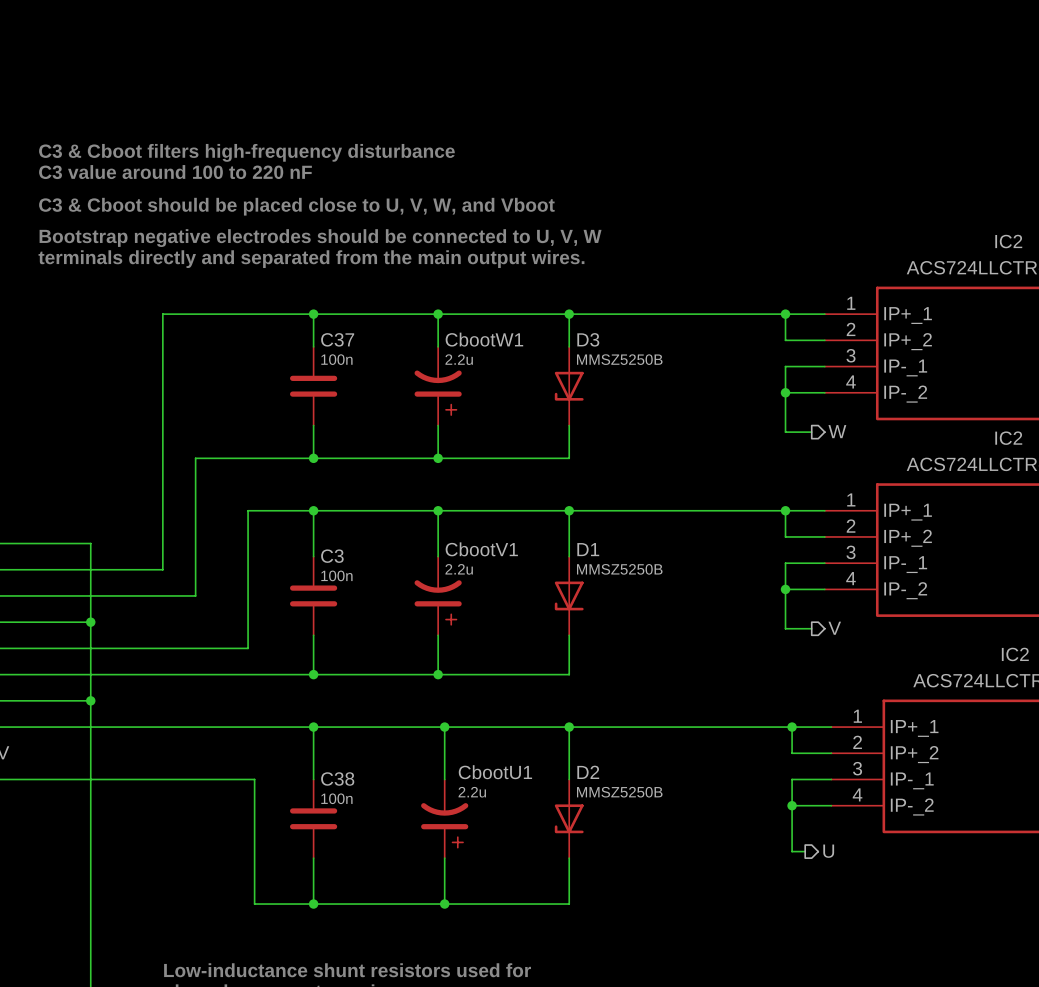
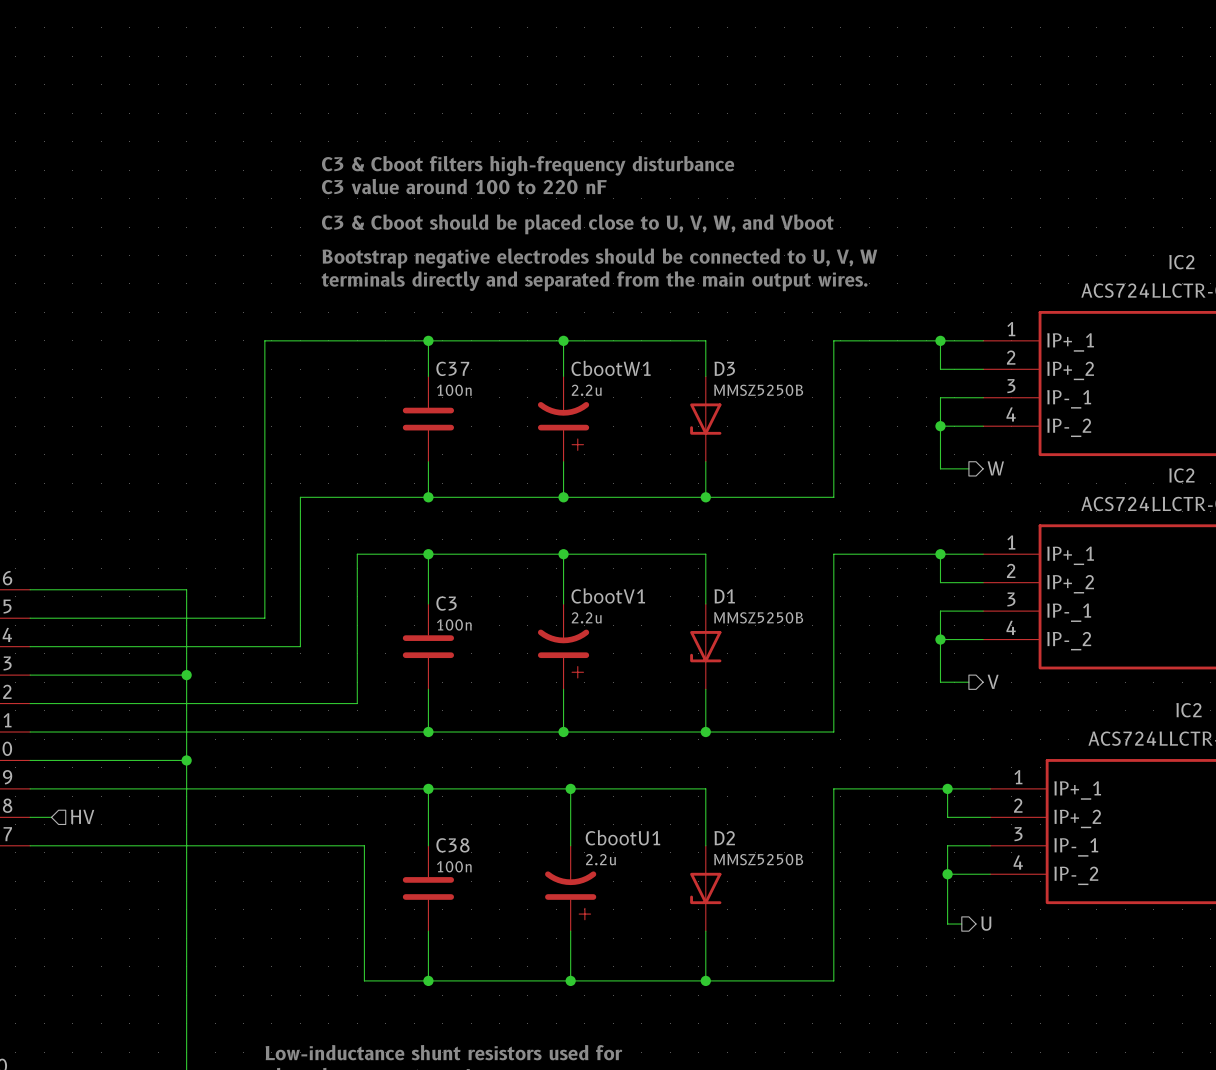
text position: C3 & Cboot filters high-frequency disturbance (246, 152) -> C3 & Cboot filters high-frequency disturbance (528, 165)
text position: C3 value around 100 to 220 nF (175, 172) -> C3 value around 100 to 220 nF (464, 186)
text position: C3 & Cboot should be placed close to U, V, W, and Vboot (296, 206) -> C3 & Cboot should be placed close to U, V, W, and Vboot (577, 224)
text position: Bootstrap negative electrodes should be connected to U, V, W (320, 238) -> Bootstrap negative electrodes should be connected to U, V, W (599, 258)
text position: terminals directly and separated from the main output wires. (311, 259) -> terminals directly and separated from the main output wires. (594, 281)
wire: (569, 314) (687, 314) -> (705, 497) (833, 497) (833, 340)
junction: (569, 314) -> none
wire: (569, 510) (687, 510) -> (705, 732) (833, 732) (833, 554)
junction position: (569, 510) -> (705, 497)
wire: (569, 727) (687, 727) -> (705, 980) (833, 980) (833, 788)
junction position: (569, 727) -> (705, 732)
junction: none -> (705, 980)

